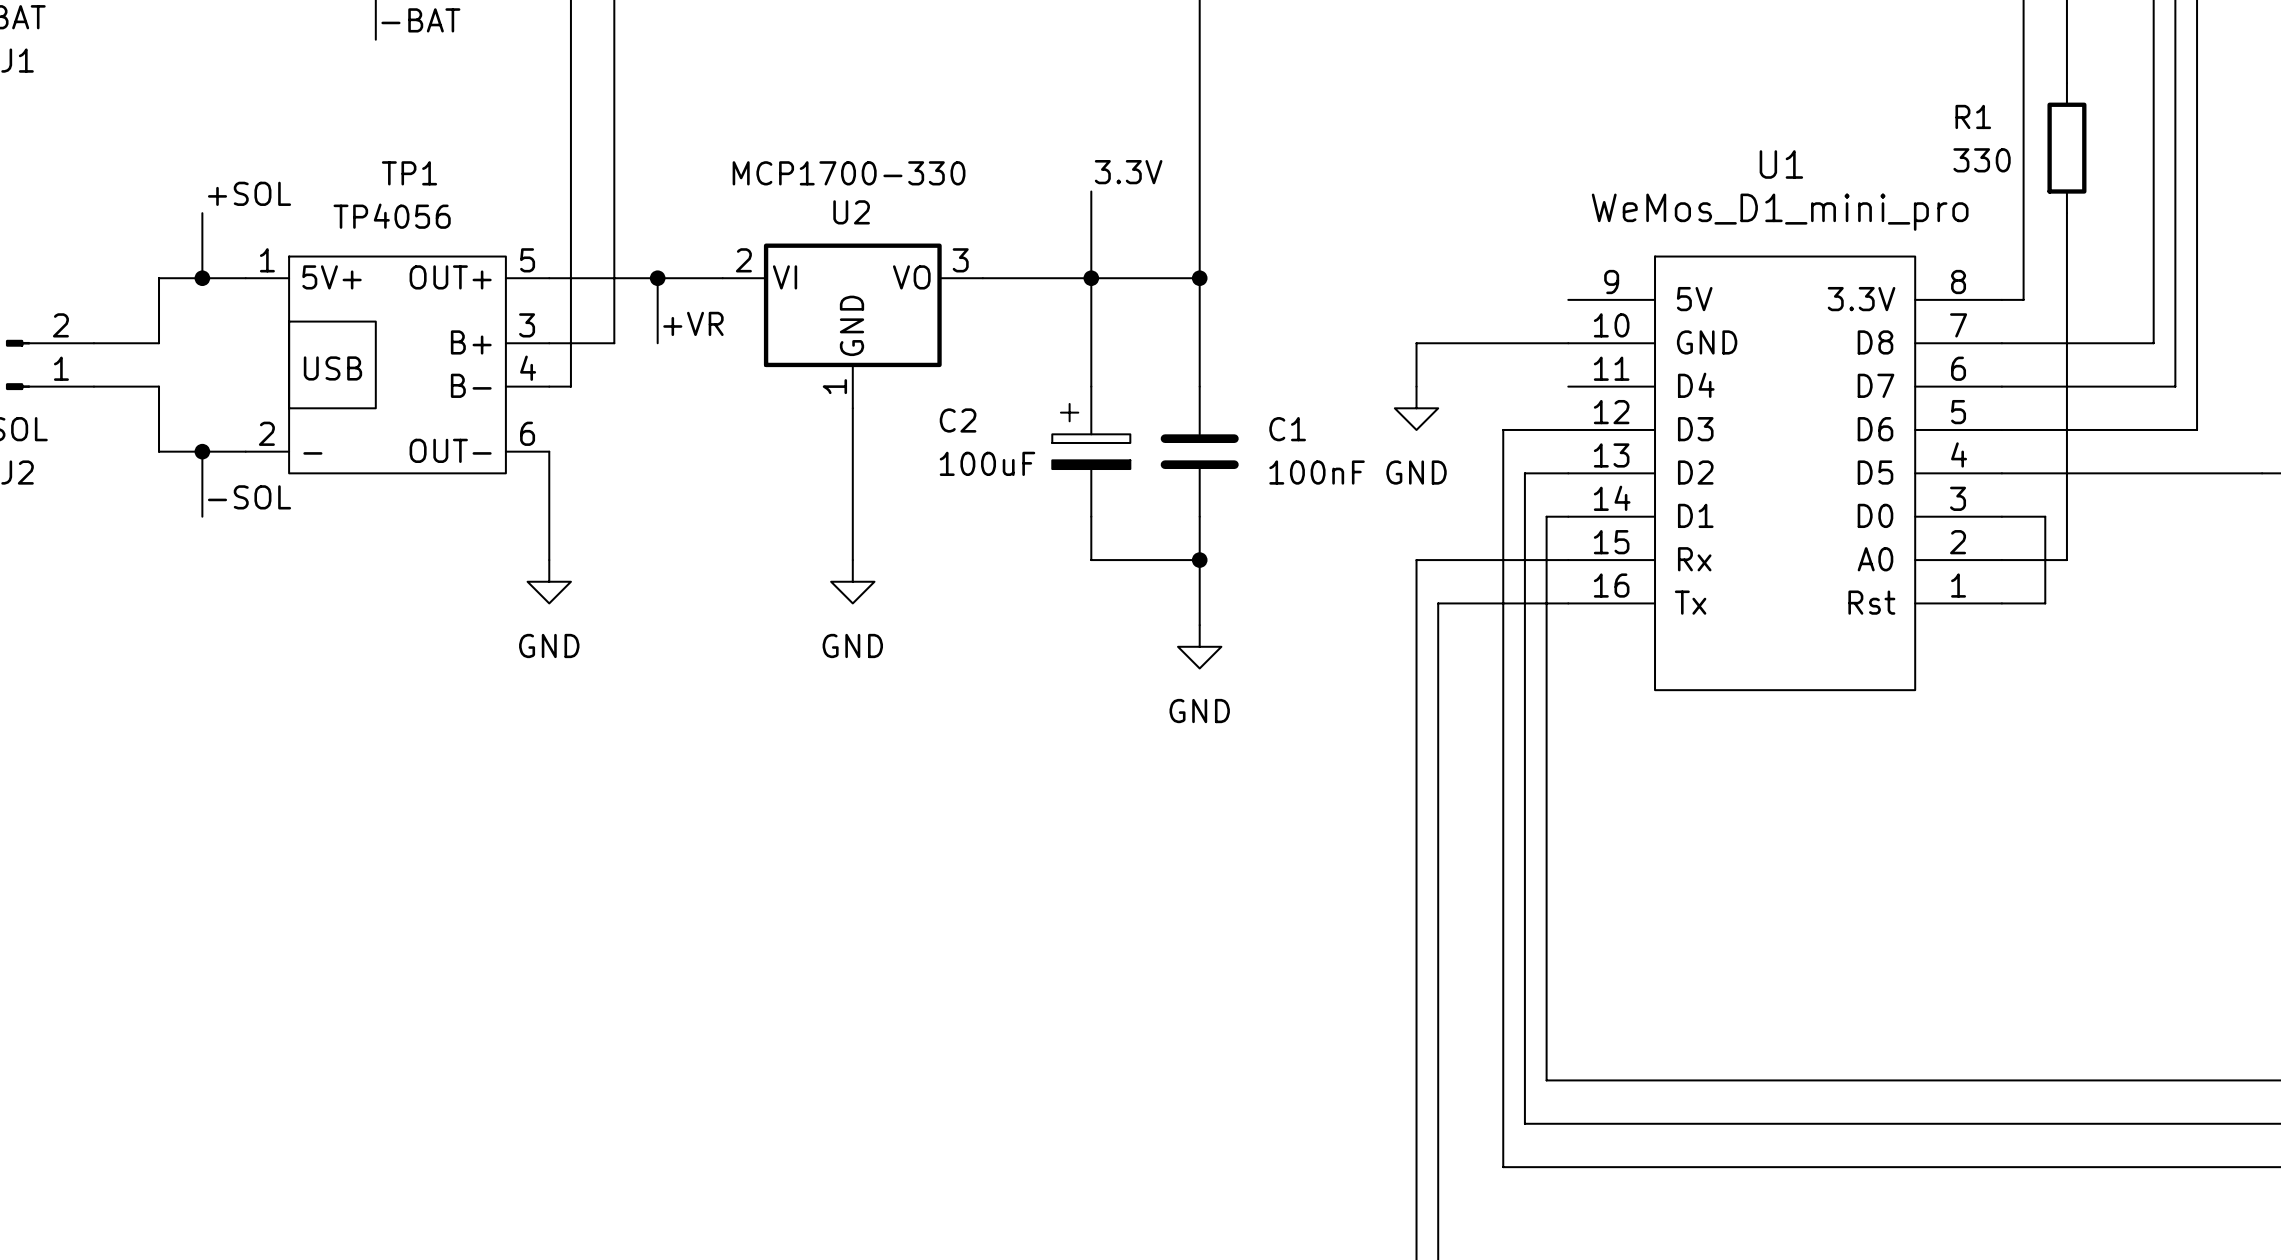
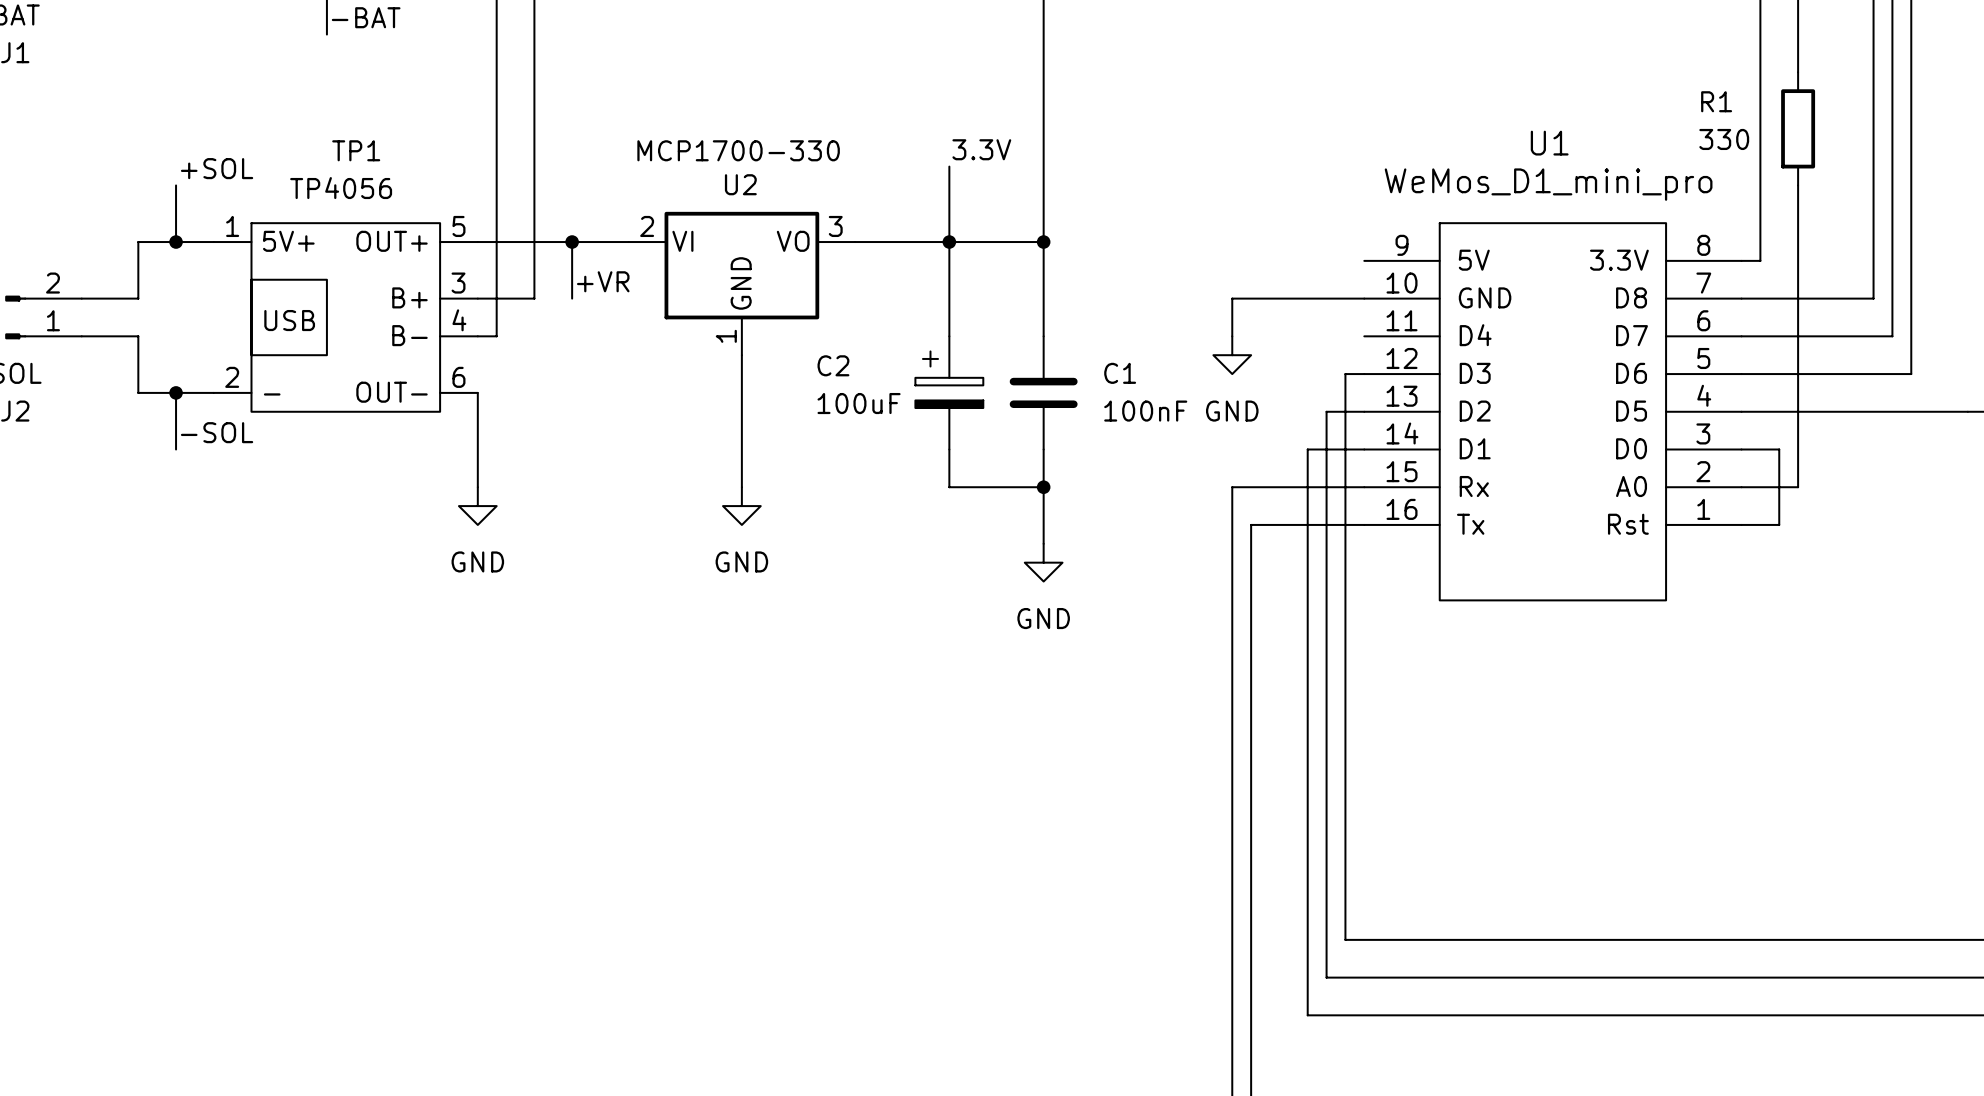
wire: (1546, 429) (1503, 429) (1503, 516) -> (1345, 374) (1345, 449) (1307, 449)

